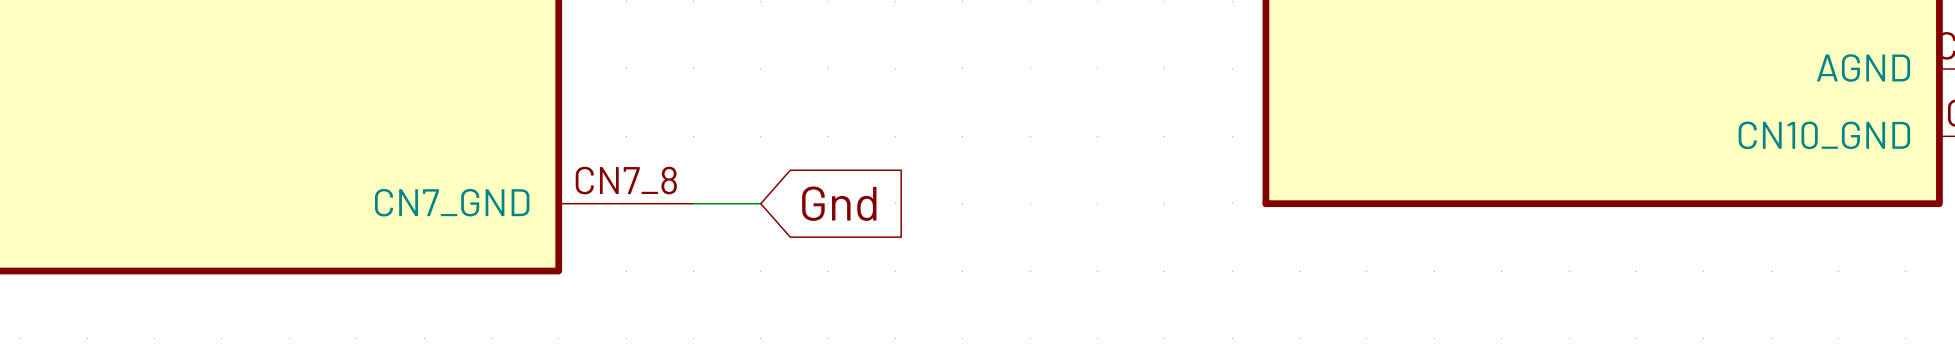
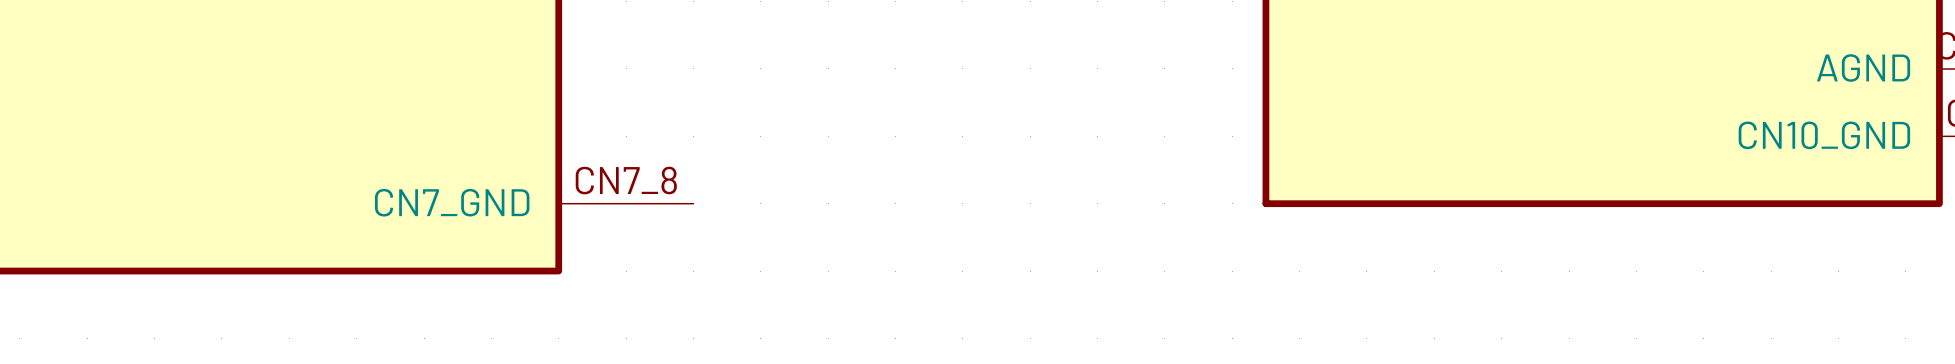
wire: (693, 203) (760, 203) -> none
global label: Gnd (839, 203) -> none

